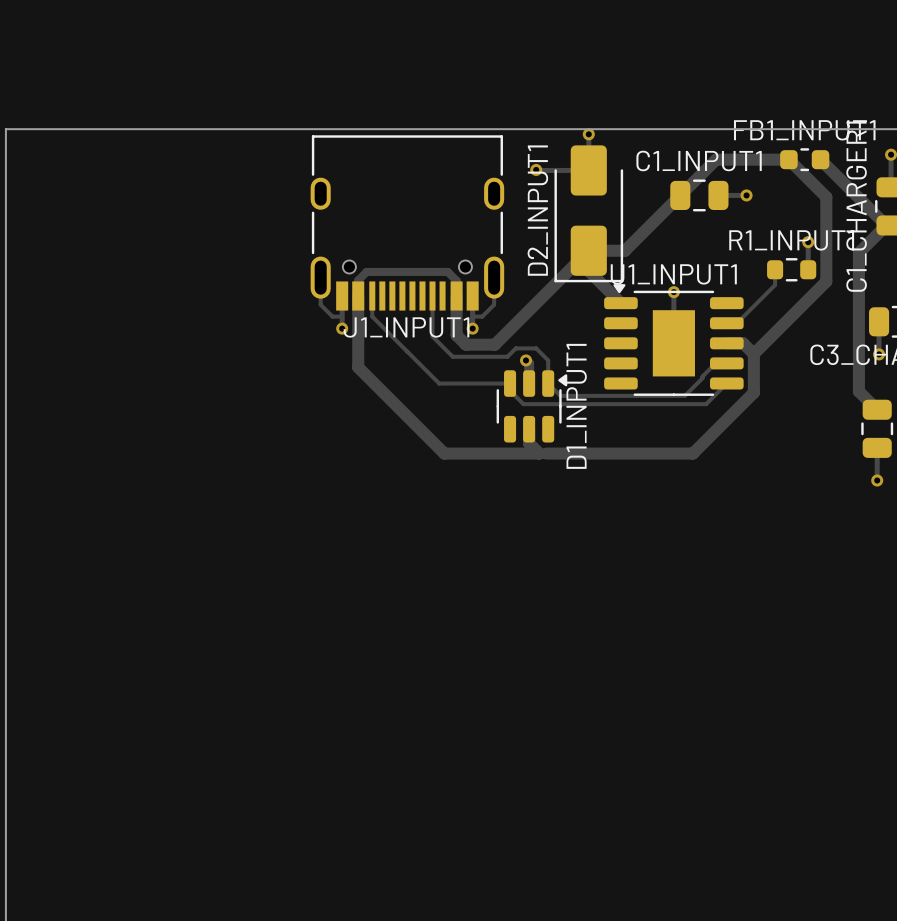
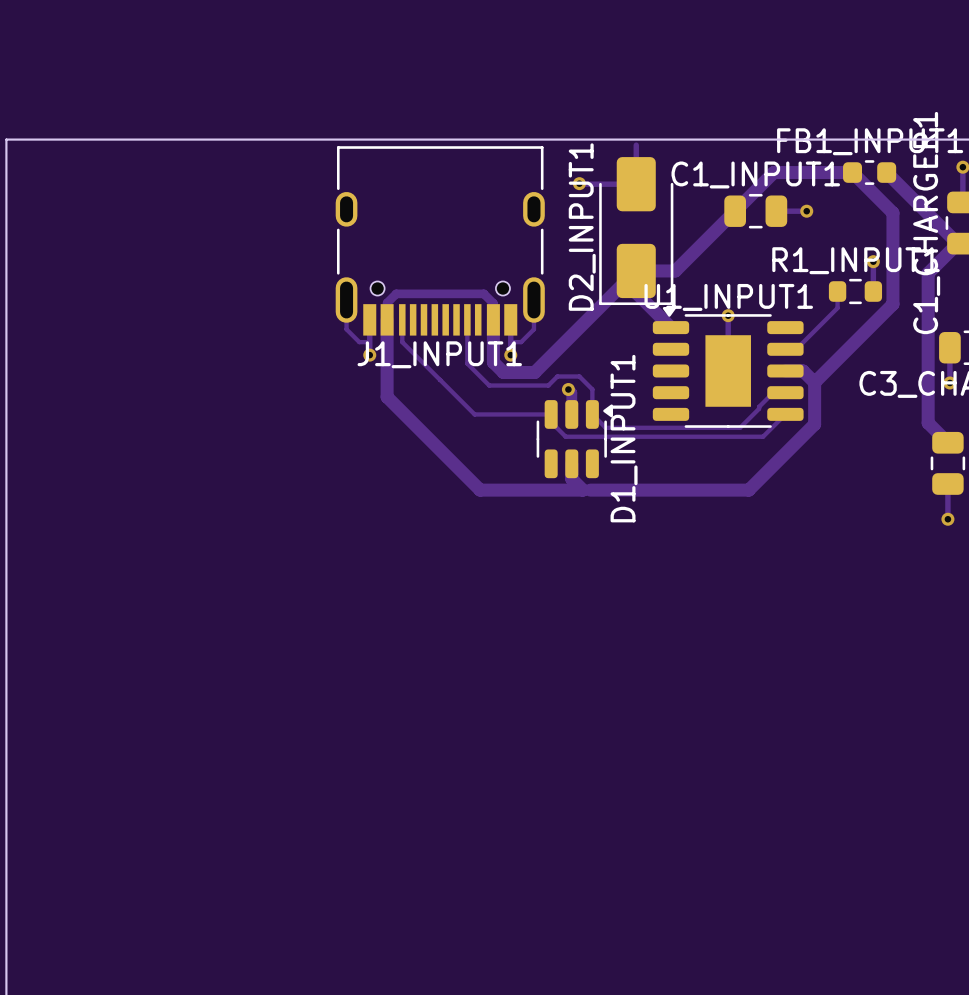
via: (588, 134) -> none

